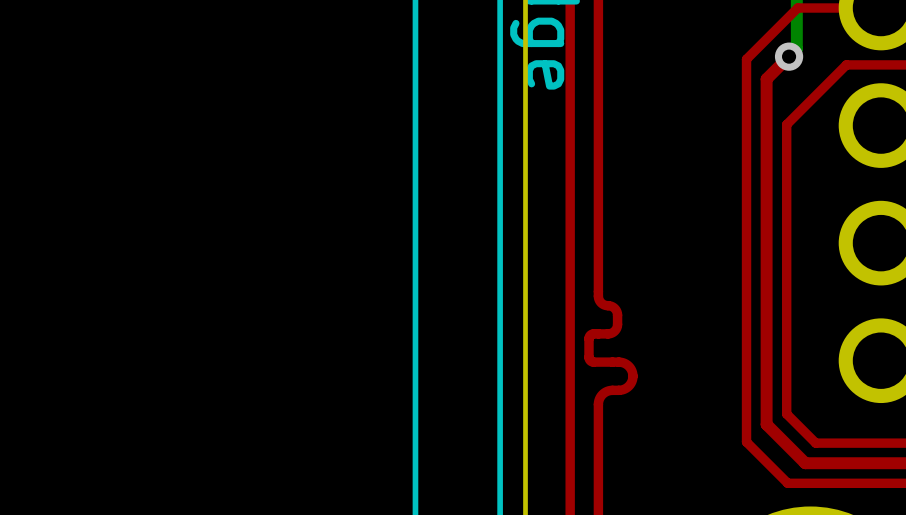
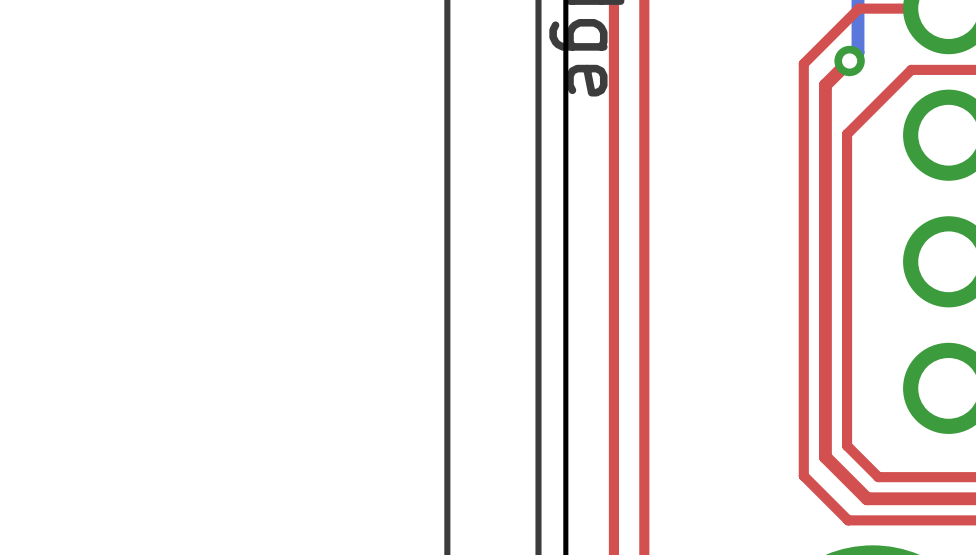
top track: (598, 296) (602, 303) (612, 306) (616, 310) (617, 325) (611, 333) (590, 335) (589, 359) (593, 362) (624, 363) (630, 367) (632, 376) (627, 387) (605, 392) (600, 397) (598, 404) -> (644, 318) (644, 435)

